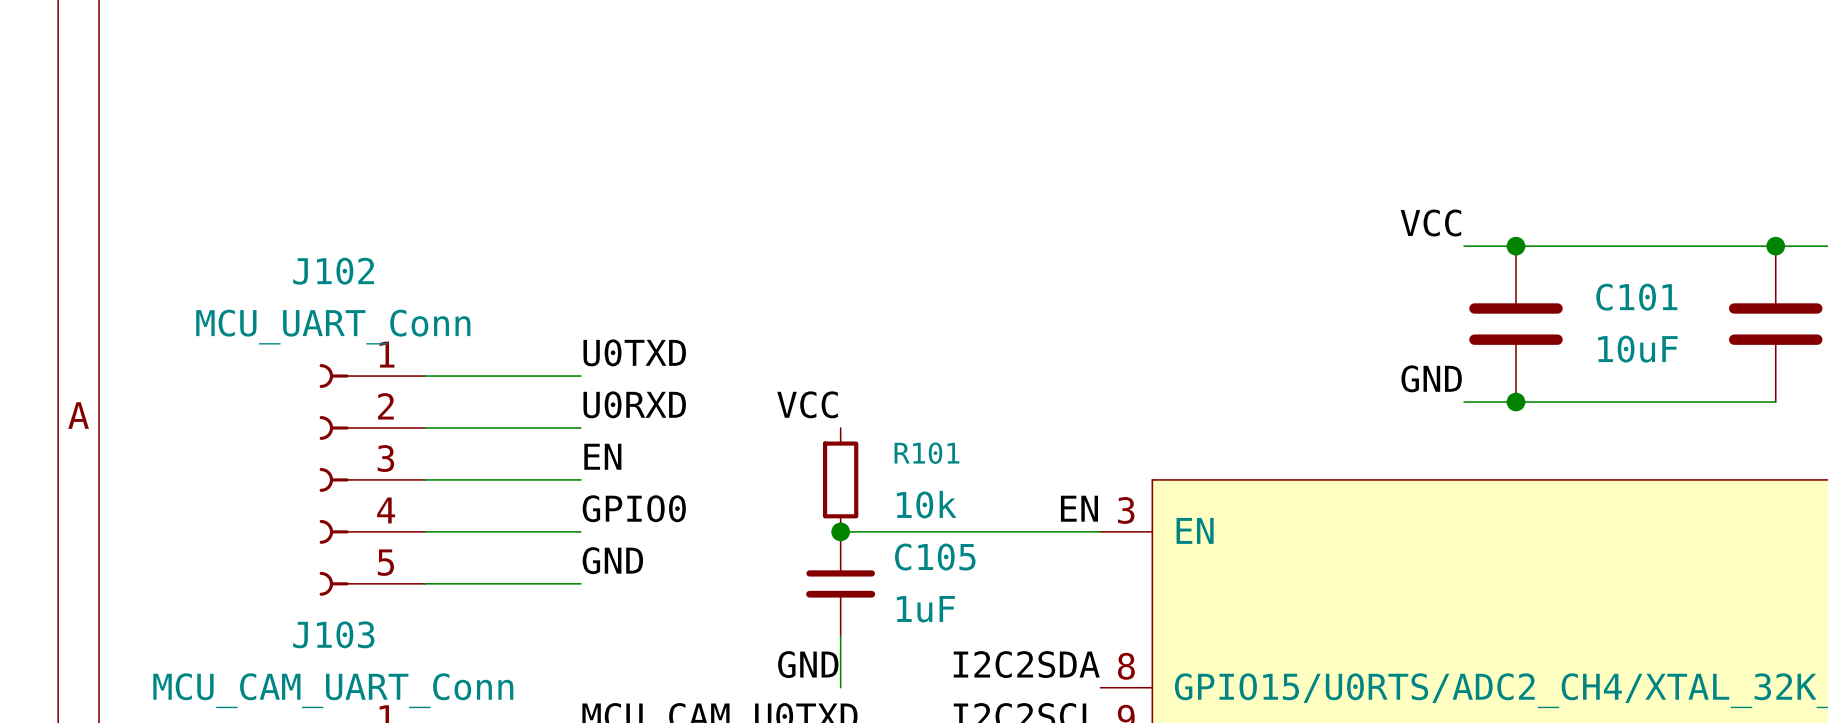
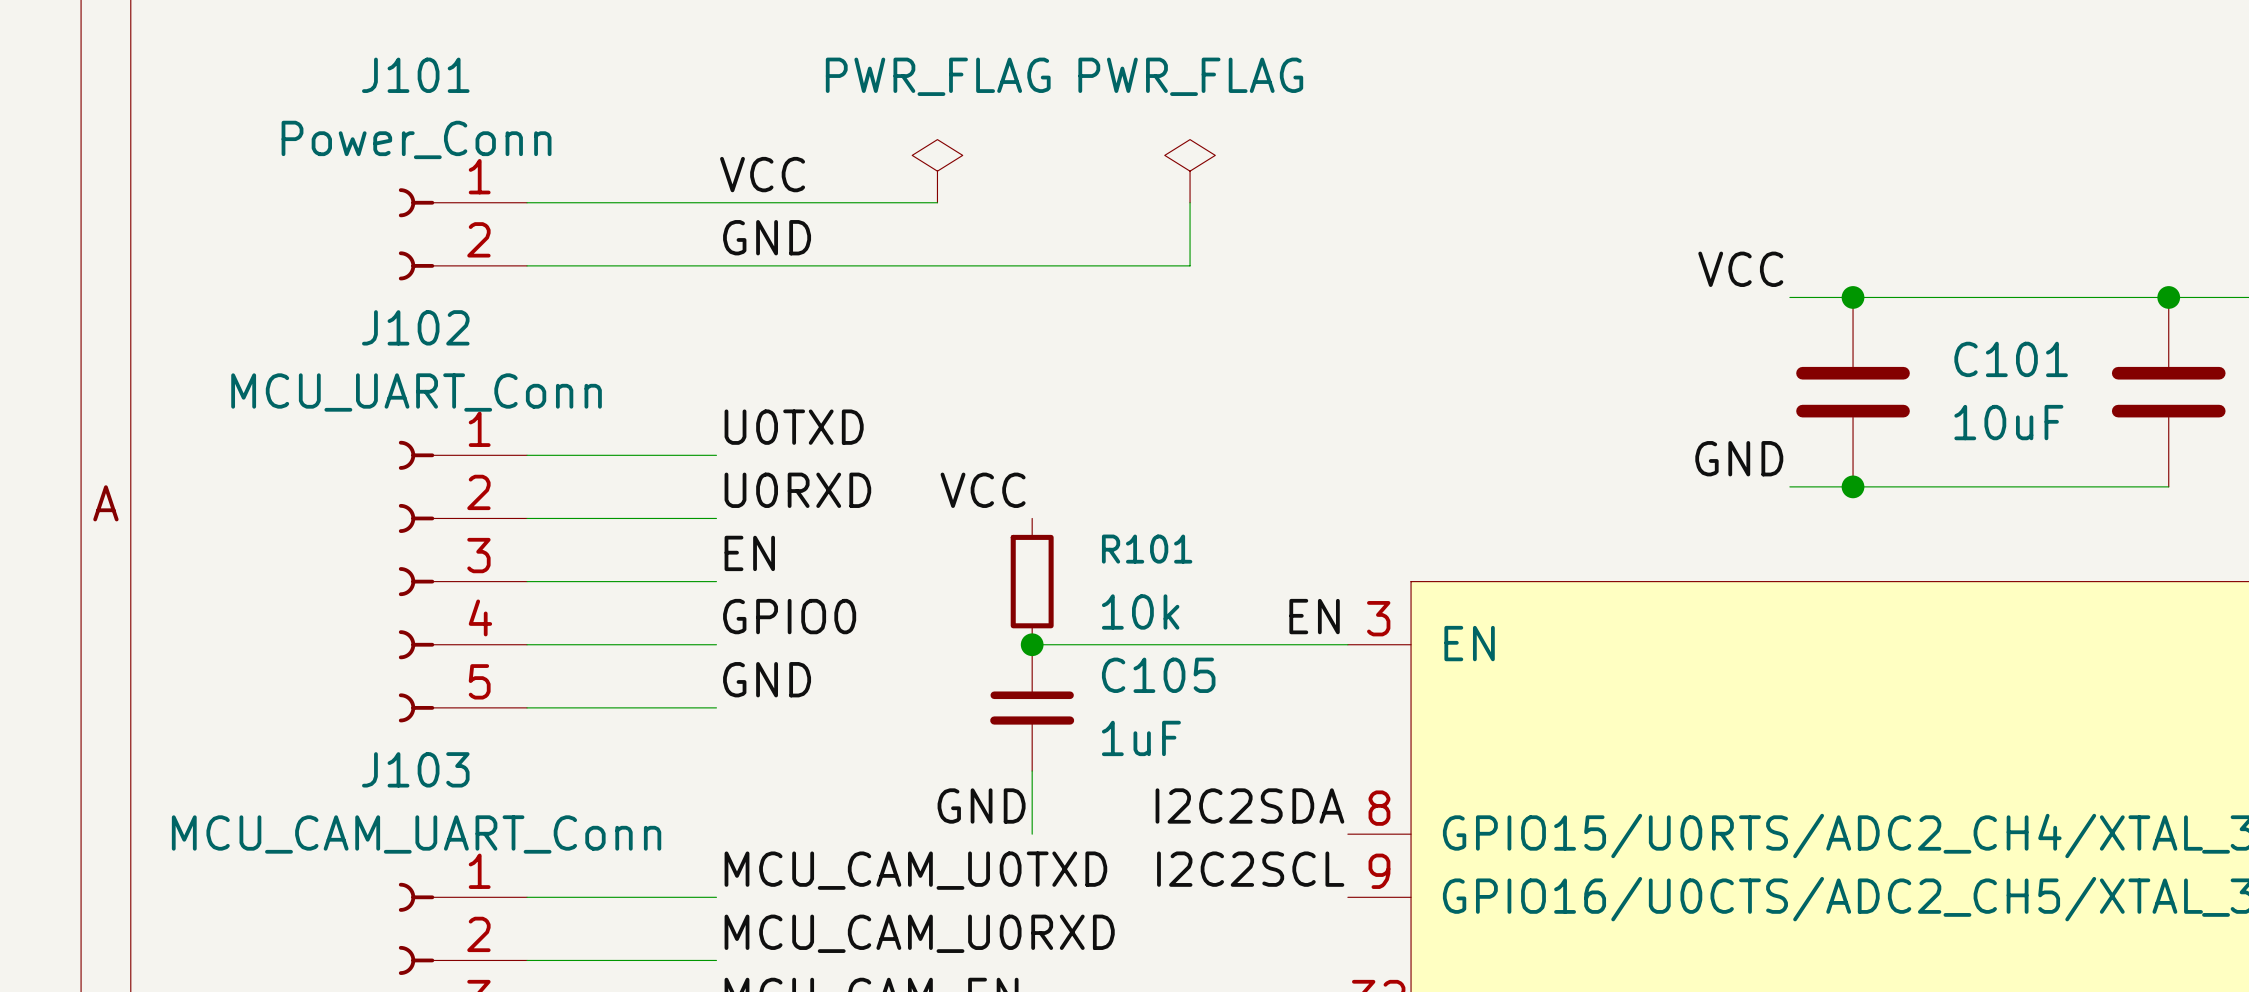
power symbol: none -> PWR_FLAG (937, 171)
power symbol: none -> PWR_FLAG (1190, 171)
label: none -> VCC (762, 174)
wire: none -> (527, 202) (937, 202)
wire: none -> (1190, 202) (1190, 265) (527, 265)
J101: none -> Power_Conn (462, 234)
label: none -> GND (767, 237)

